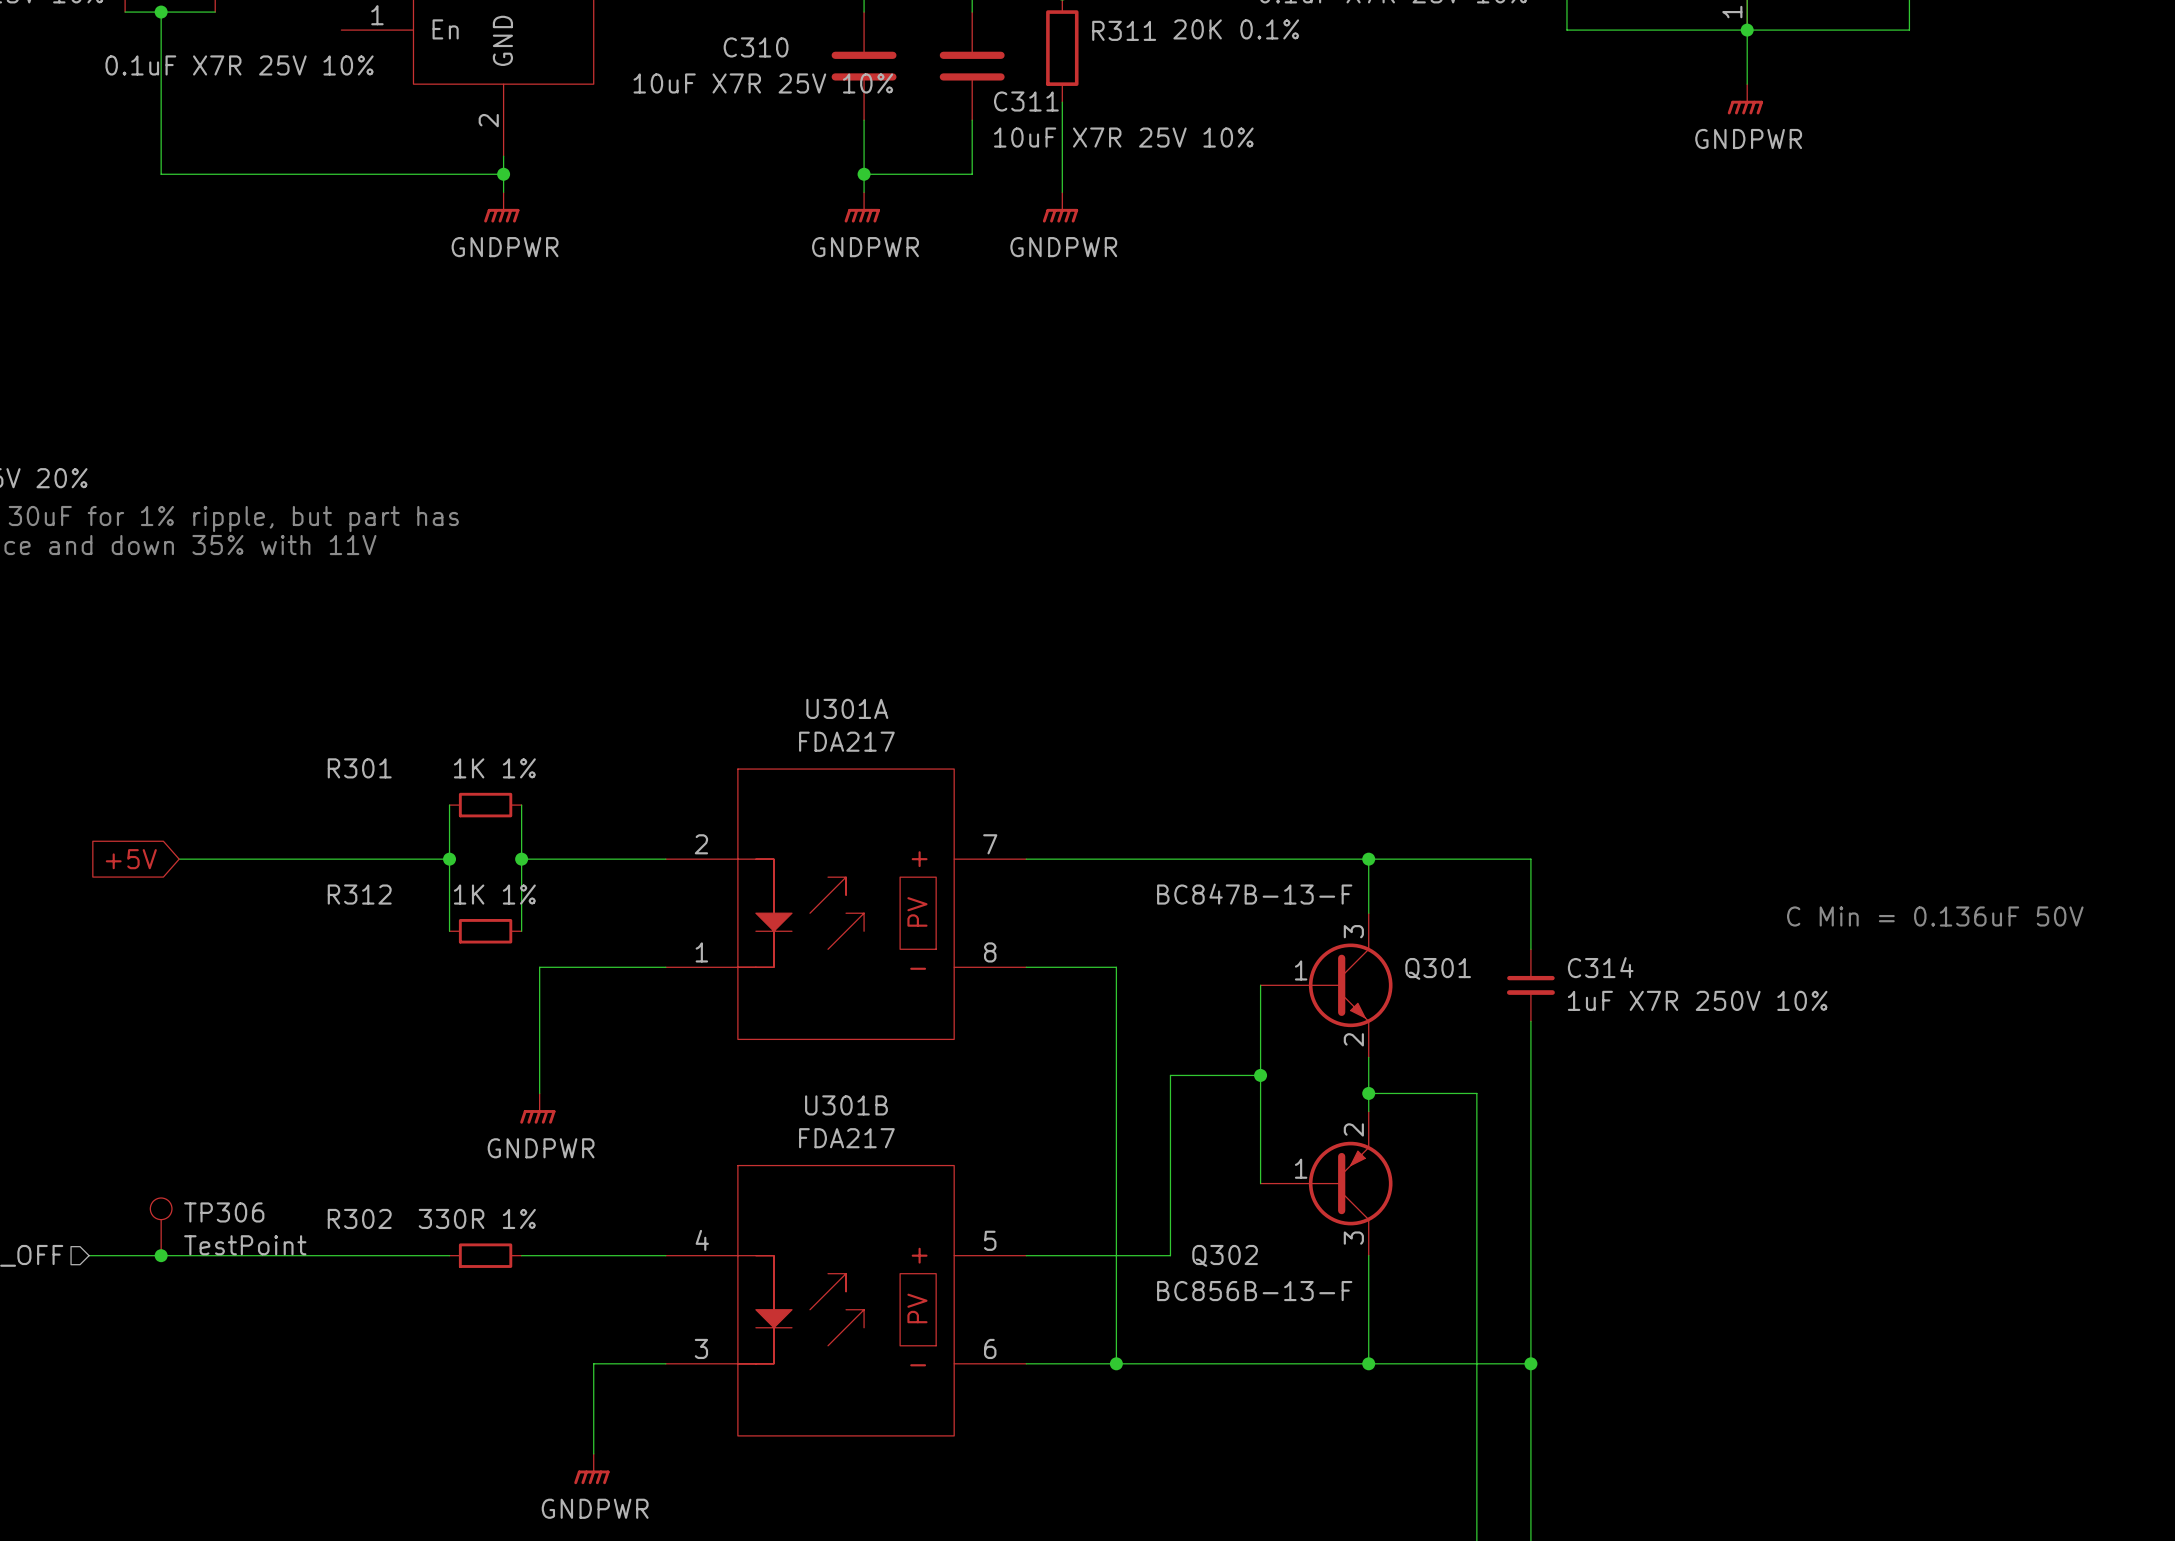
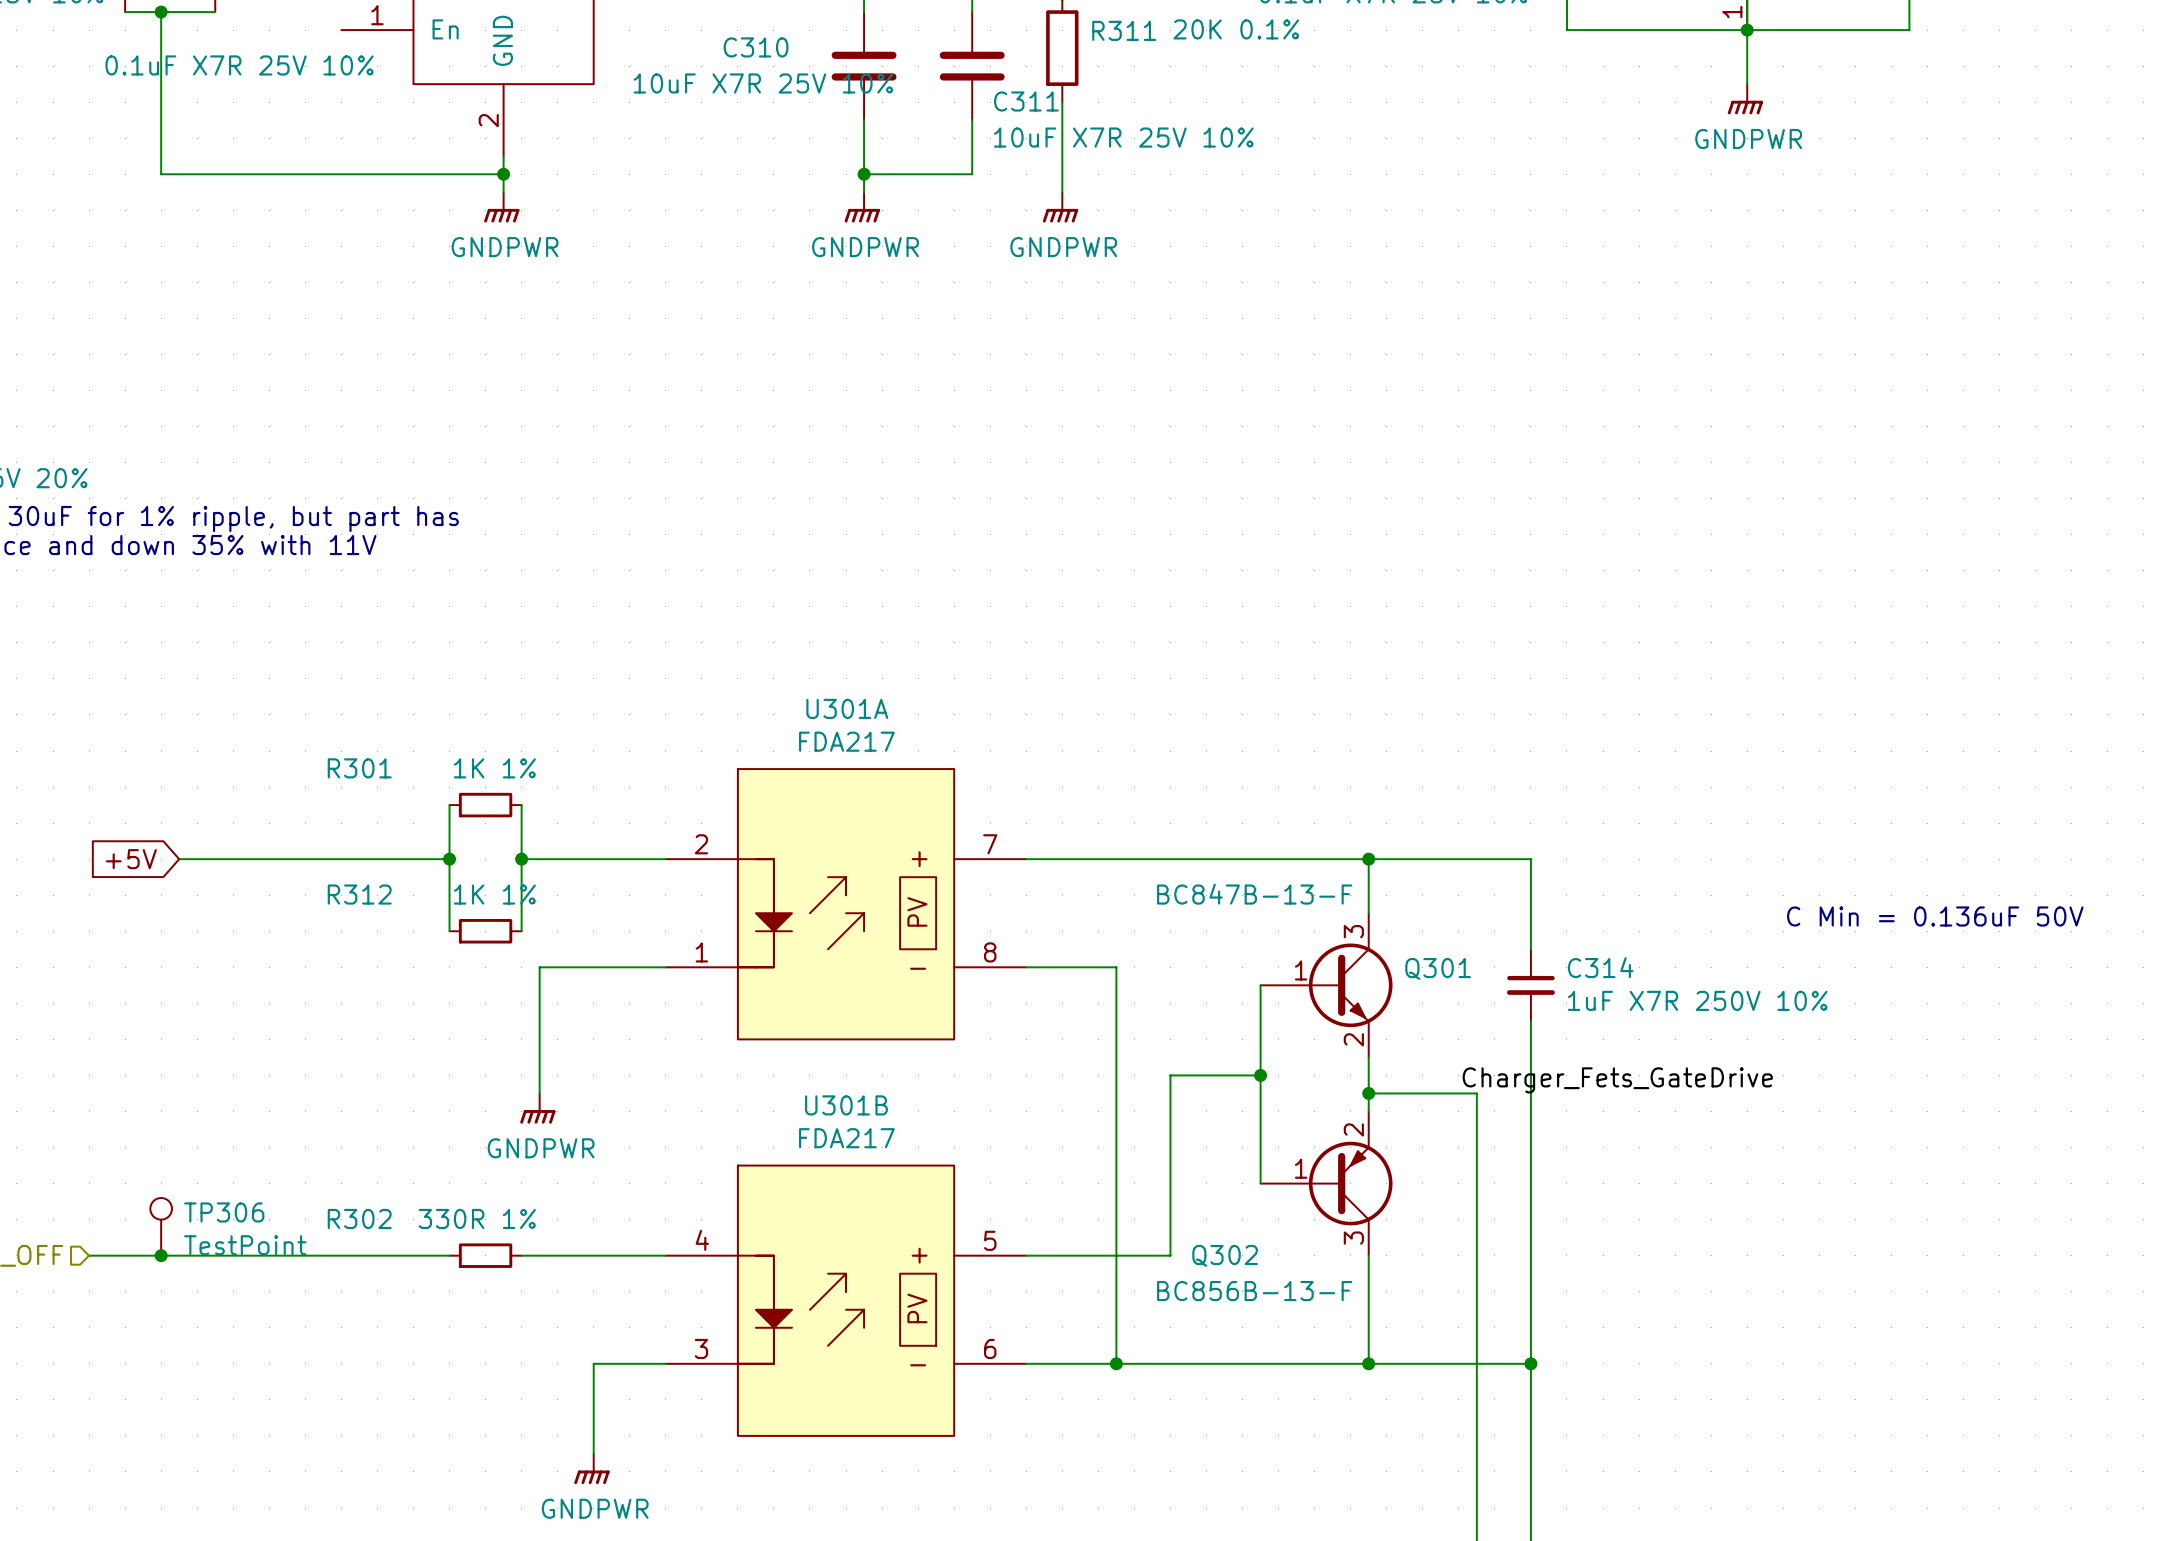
label: none -> Charger_Fets_GateDrive (1617, 1080)

